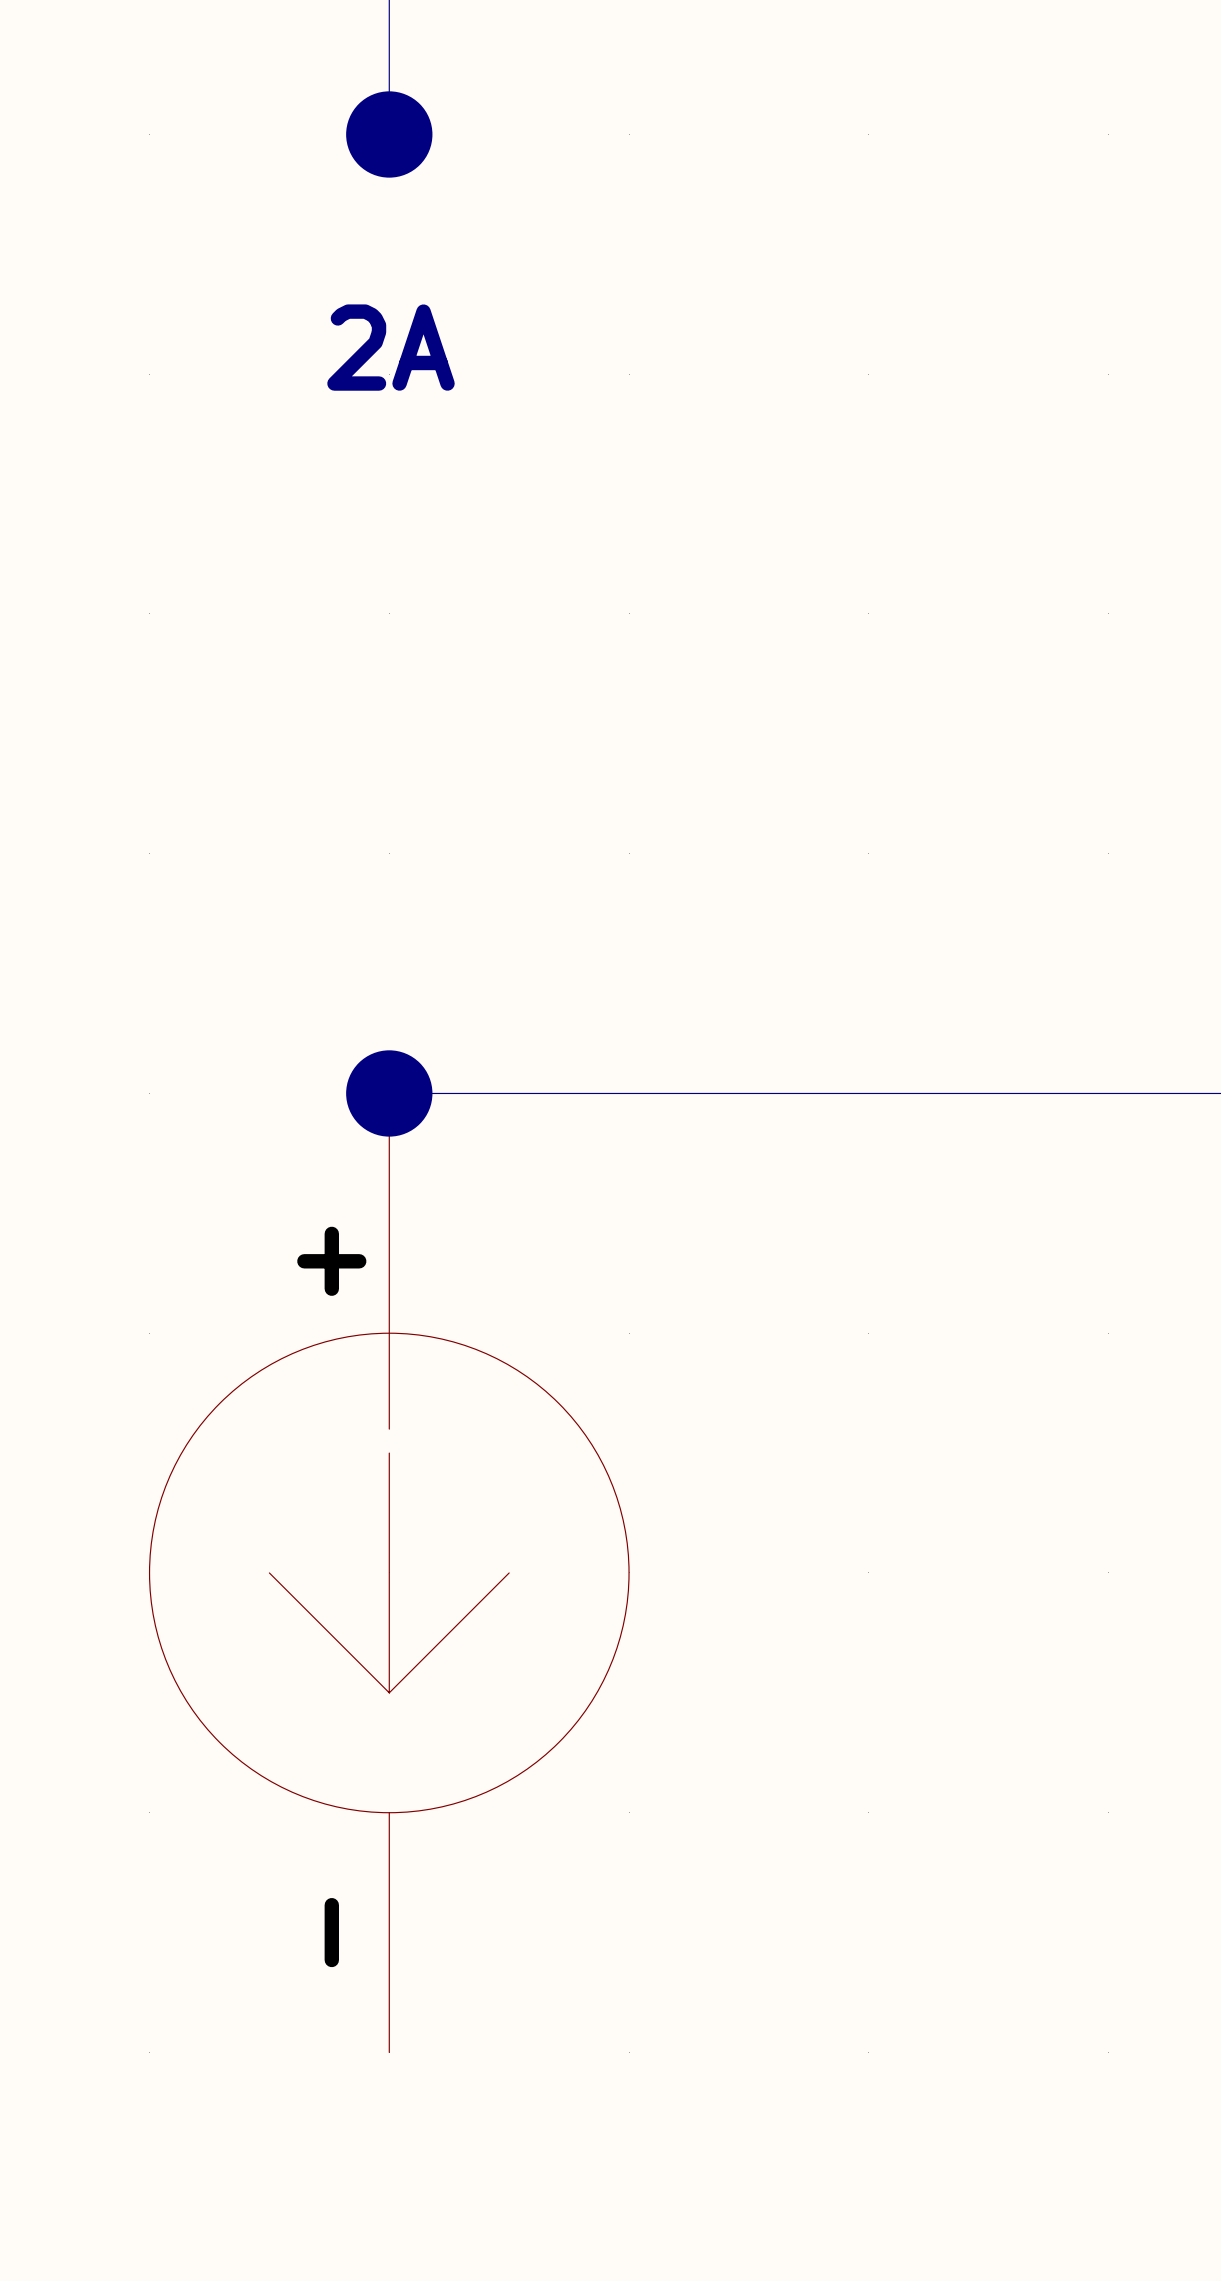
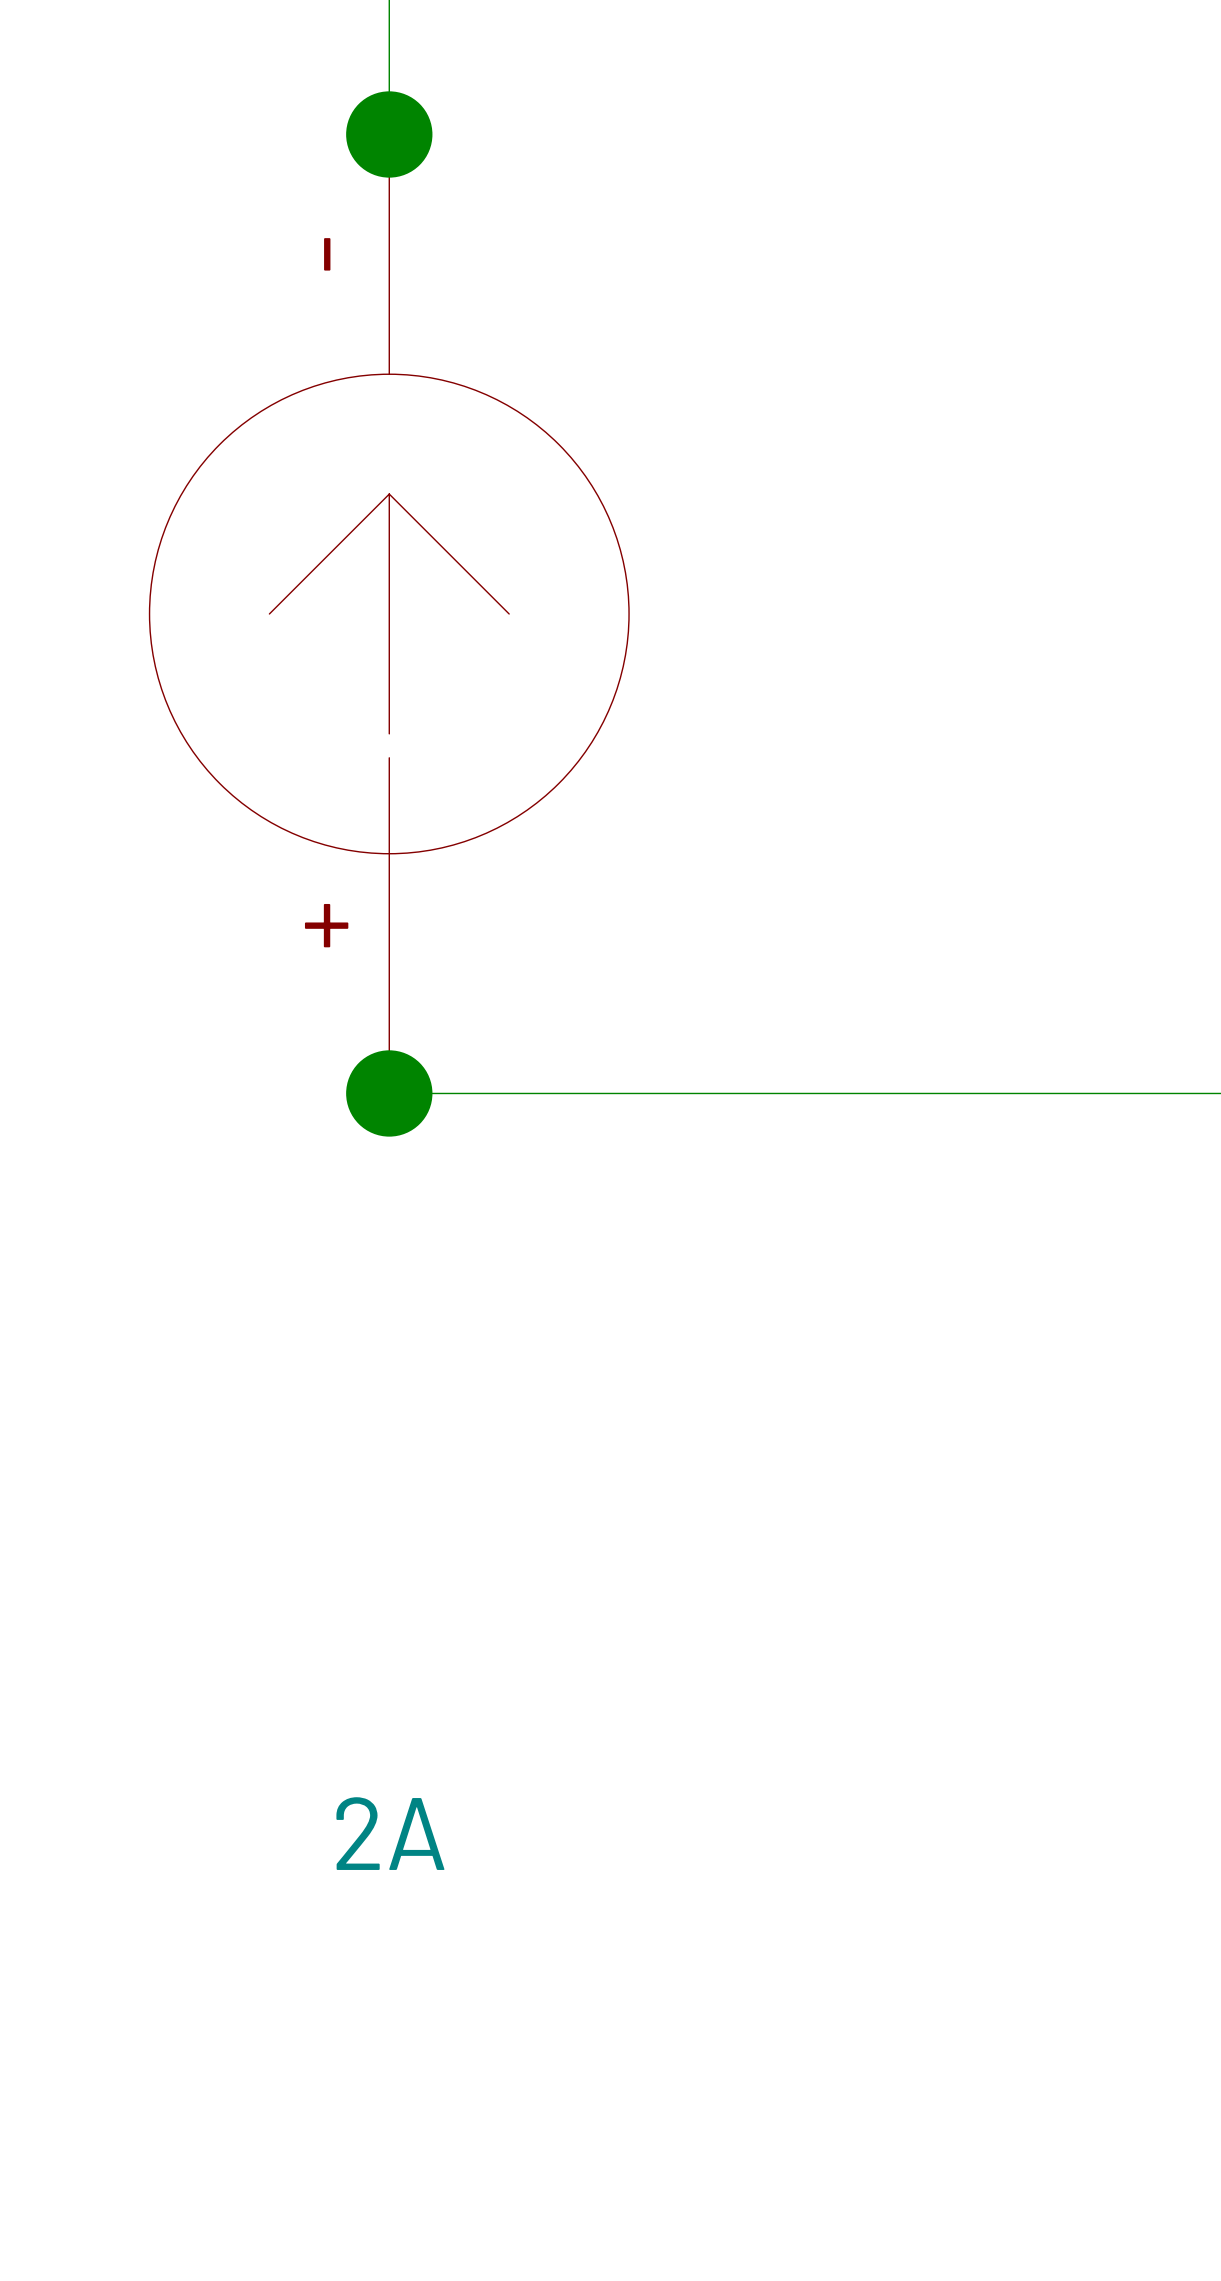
part rotation: 0° (389, 1572) -> 180° (389, 613)
part position: (389, 1572) -> (389, 613)

